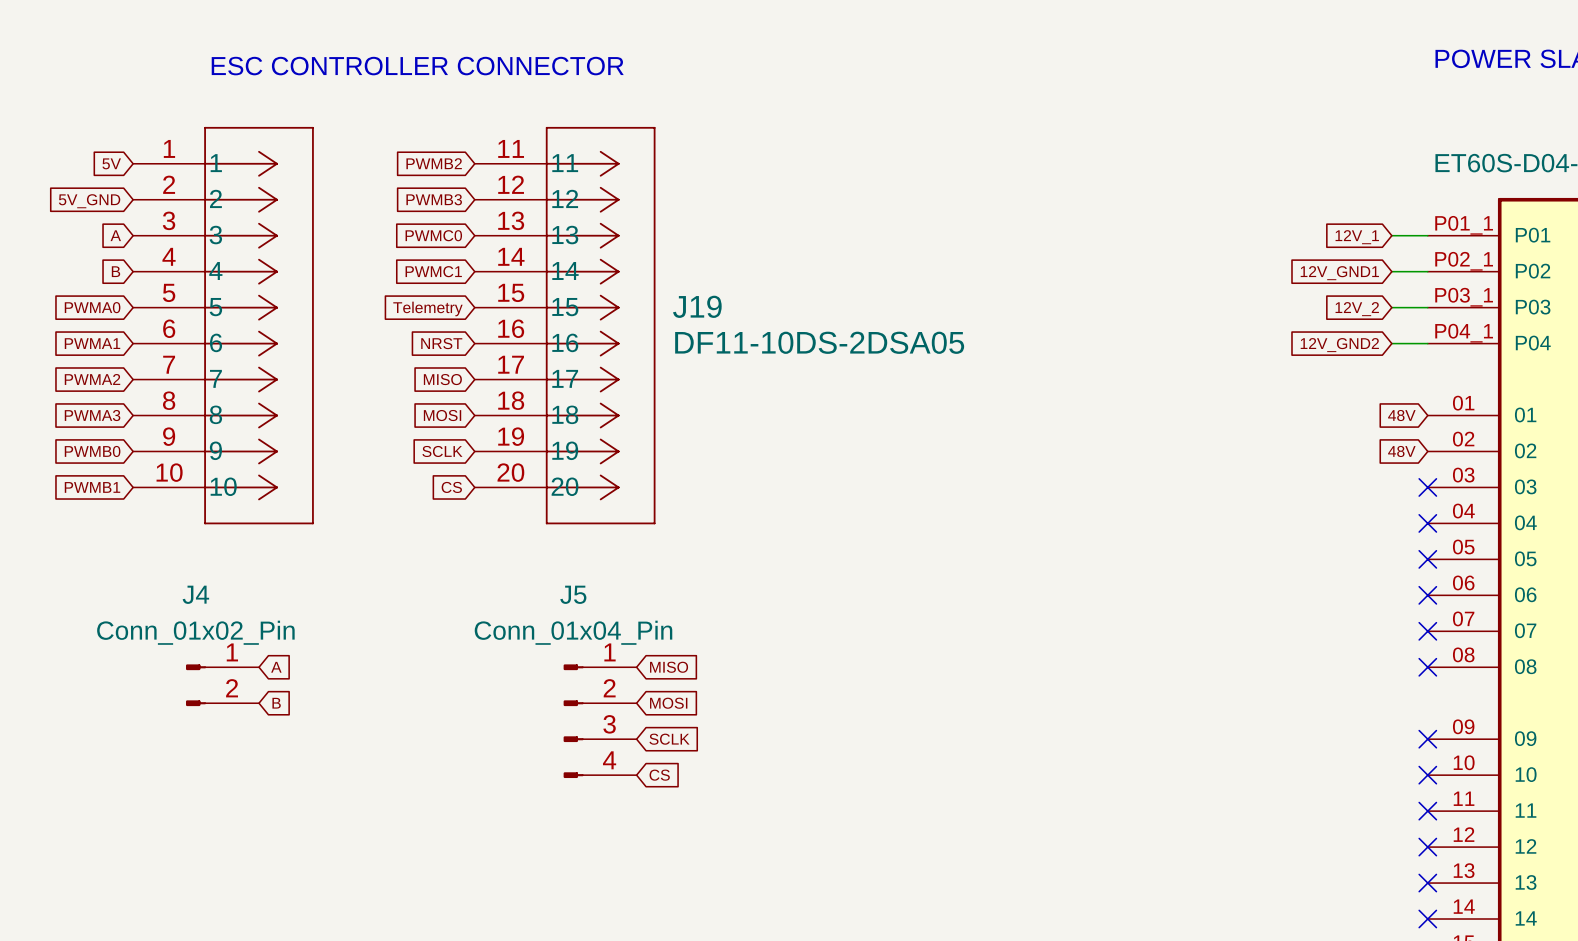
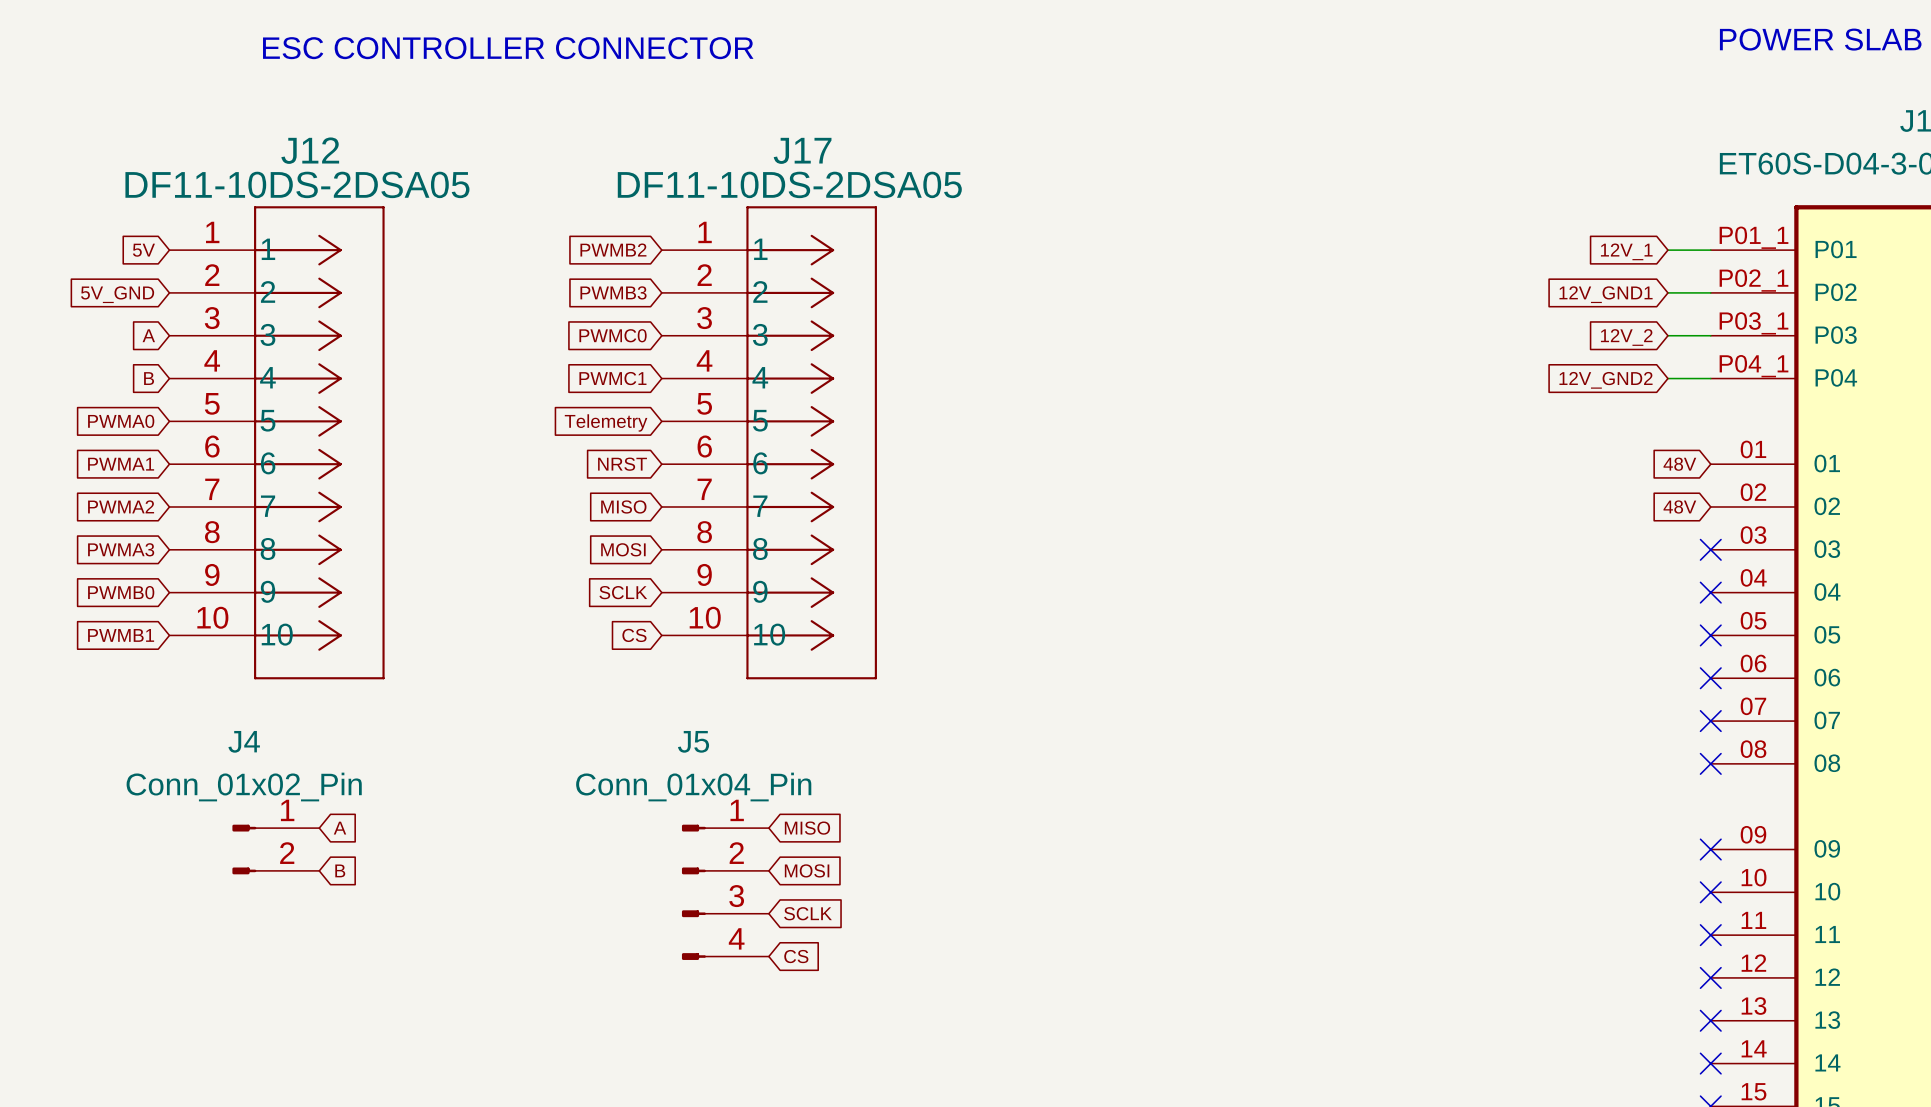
global label: 5V (111, 163) -> none
global label position: PWMB2 (434, 163) -> PWMB2 (613, 250)
global label position: PWMB3 (434, 199) -> PWMB3 (613, 292)
global label: 5V_GND (89, 201) -> none
global label: A (115, 235) -> 5V (143, 250)
global label position: PWMC0 (433, 235) -> PWMC0 (613, 335)
global label: B (116, 271) -> 5V_GND (117, 294)
global label position: PWMC1 (433, 271) -> PWMC1 (612, 378)
global label: PWMA0 (92, 307) -> A (148, 335)
global label position: Telemetry (427, 308) -> Telemetry (606, 422)
J19: DF11-10DS-2DSA05 (394, 325) -> none
global label: PWMA1 (92, 343) -> B (149, 378)
global label position: NRST (441, 343) -> NRST (622, 464)
global label: PWMA2 (92, 379) -> PWMA0 (121, 421)
global label position: MISO (442, 379) -> MISO (623, 506)
J12: none -> DF11-10DS-2DSA05 (277, 442)
J17: none -> DF11-10DS-2DSA05 (769, 442)
global label: PWMA3 (92, 415) -> PWMA1 (121, 464)
global label position: MOSI (442, 415) -> MOSI (623, 549)
global label: PWMB0 (92, 451) -> PWMA2 (121, 506)
global label position: SCLK (442, 451) -> SCLK (623, 592)
global label: PWMB1 (92, 487) -> PWMA3 (121, 549)
global label position: CS (451, 487) -> CS (634, 635)
global label: none -> PWMB0 (121, 592)
global label: none -> PWMB1 (121, 635)
global label position: A (276, 667) -> A (339, 828)
global label position: MISO (669, 667) -> MISO (807, 828)
J4 position: (222, 685) -> (275, 849)
global label position: B (276, 703) -> B (340, 870)
global label position: MOSI (668, 703) -> MOSI (807, 870)
J5 position: (600, 721) -> (725, 892)
global label position: SCLK (669, 739) -> SCLK (808, 913)
global label position: CS (659, 775) -> CS (796, 956)

